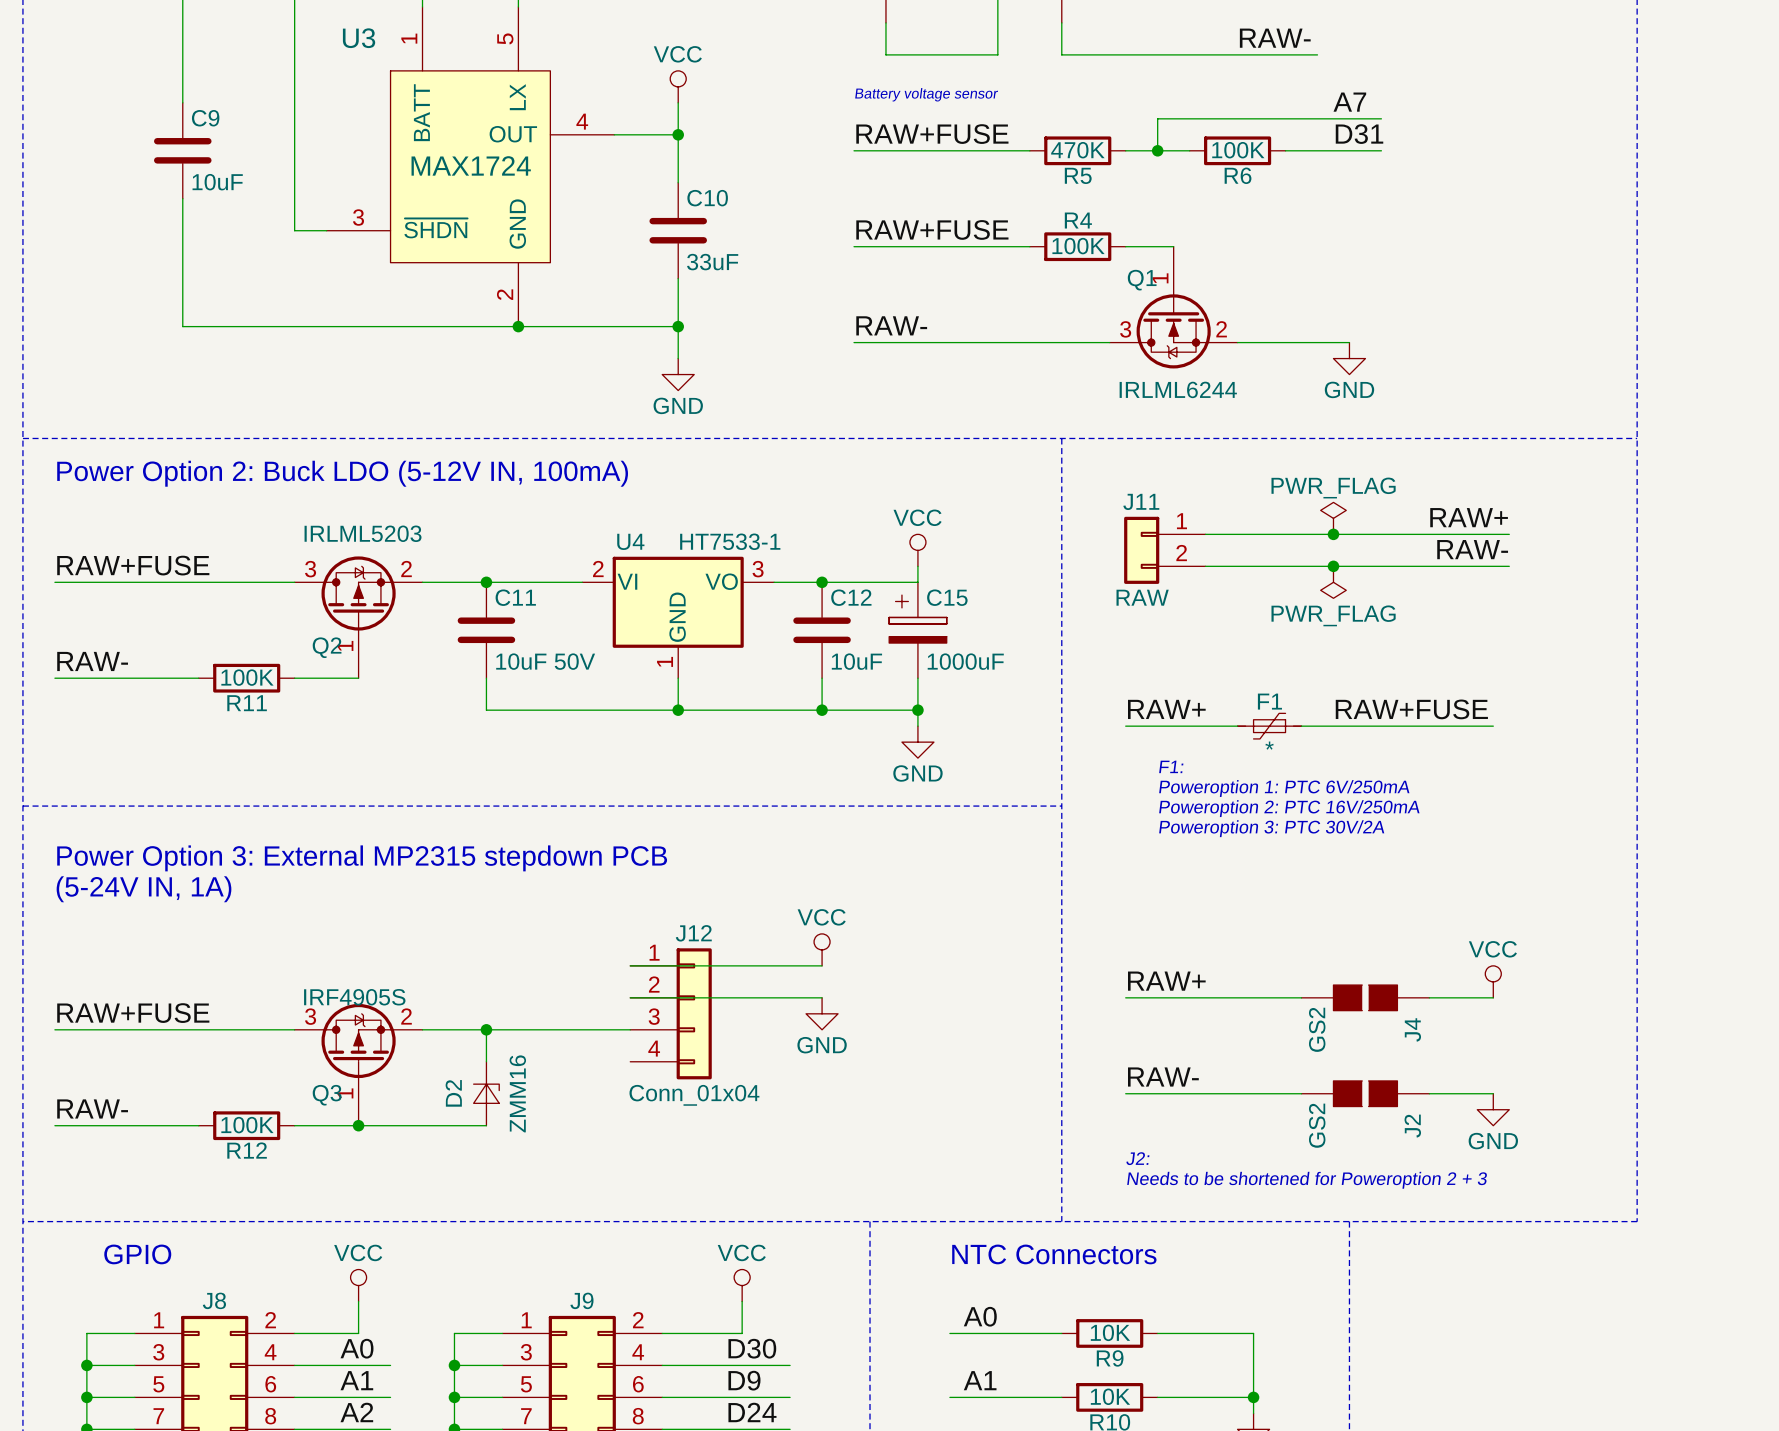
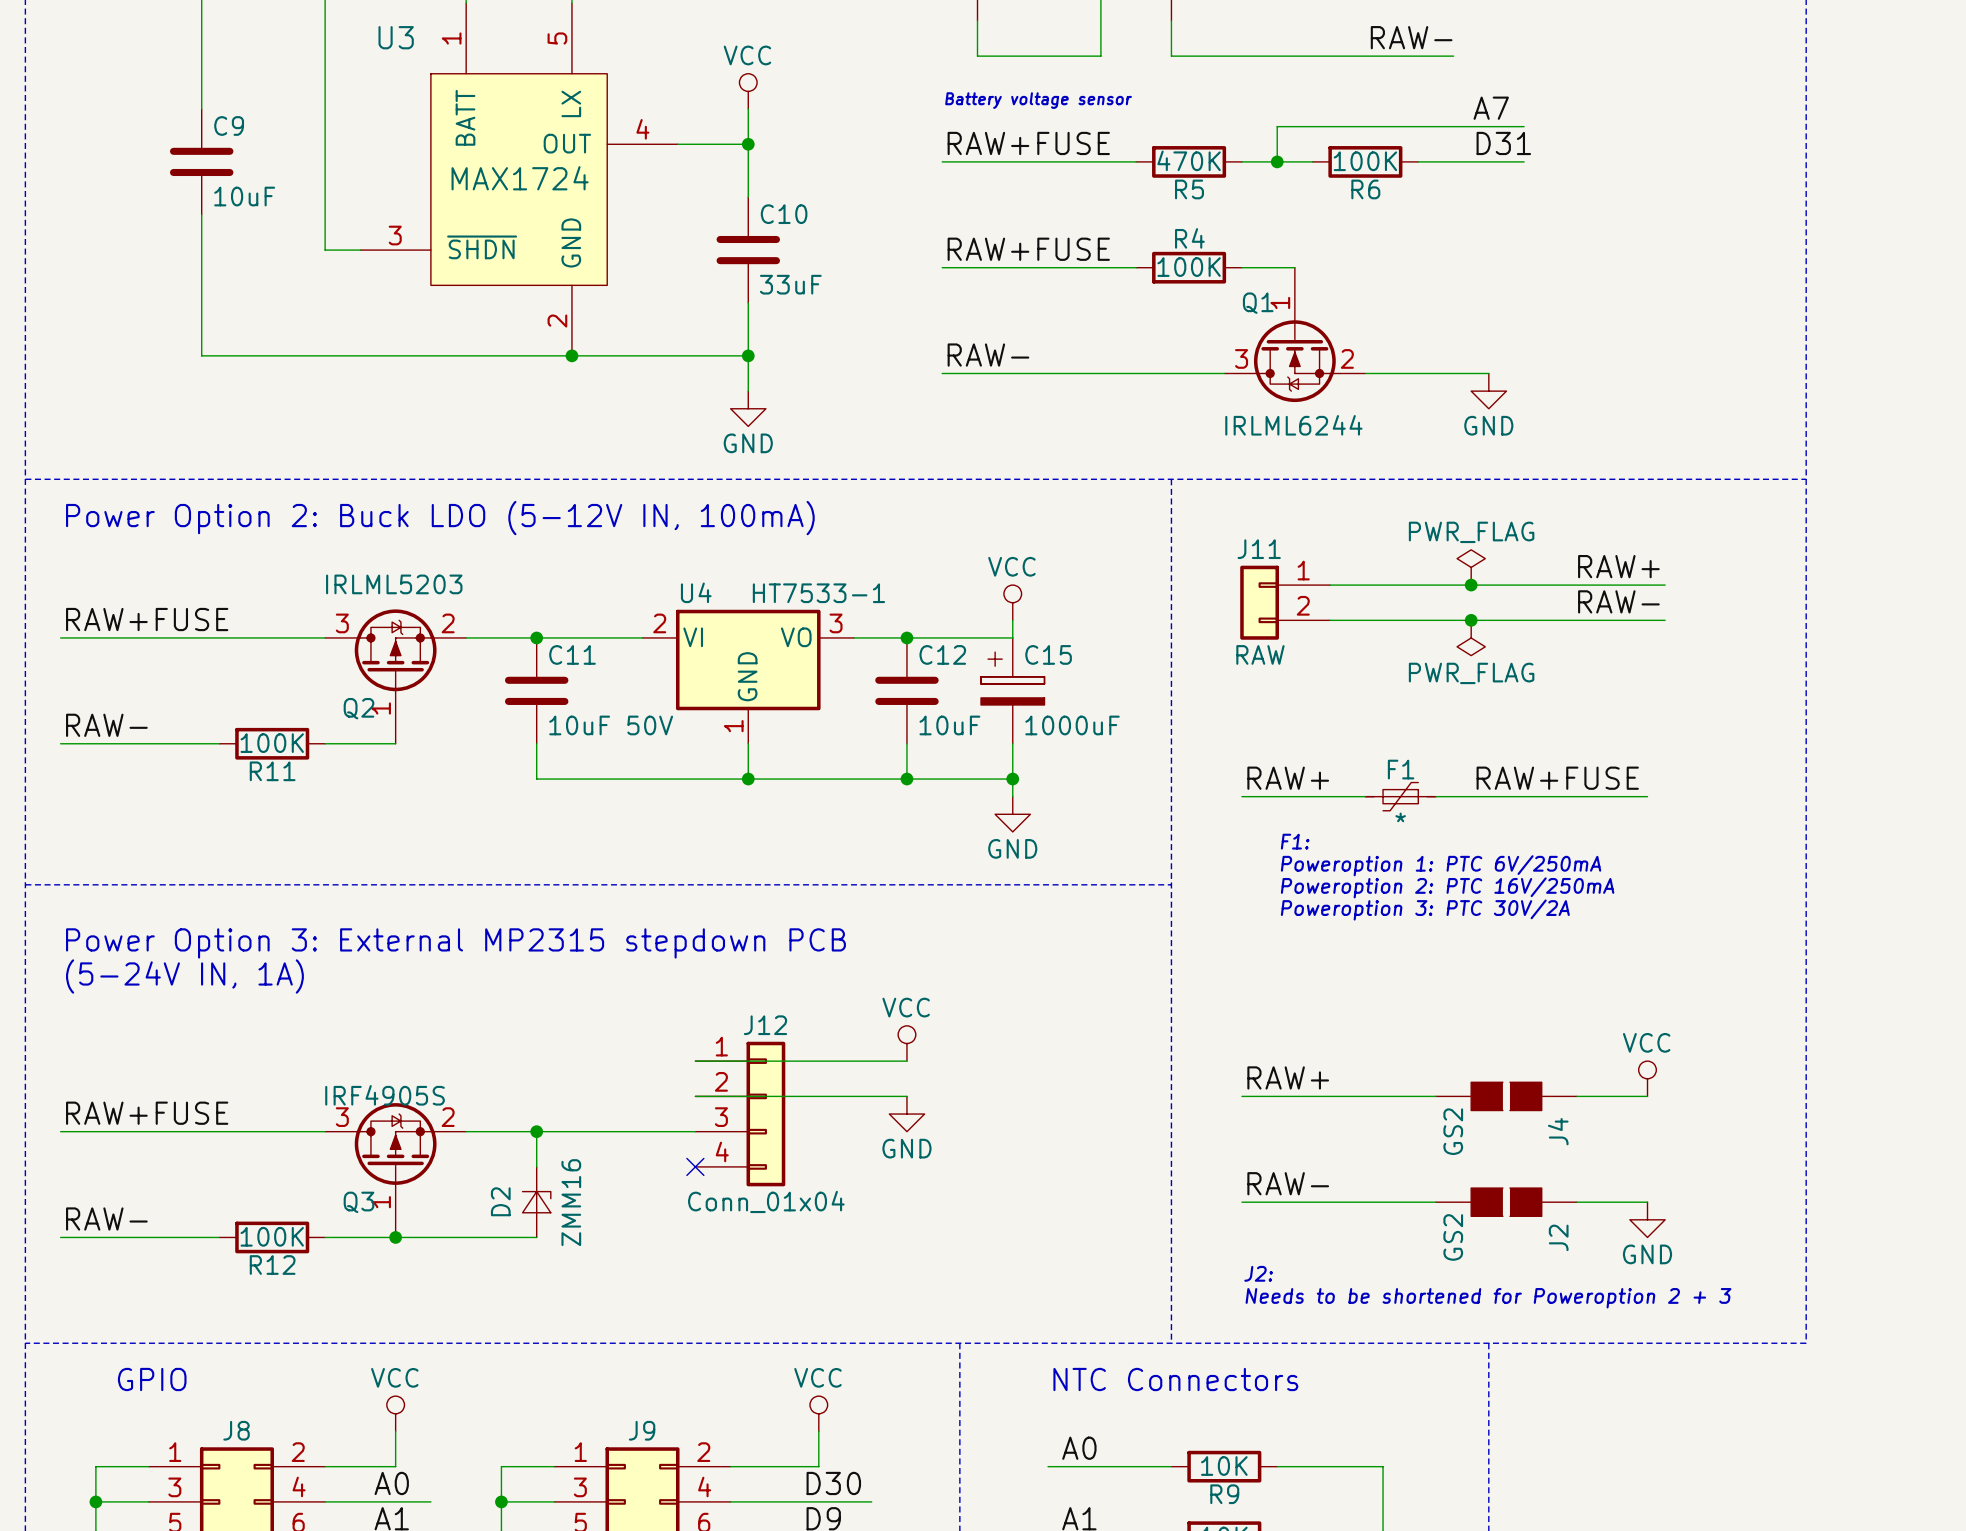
no-connect mark: none -> (695, 1166)

